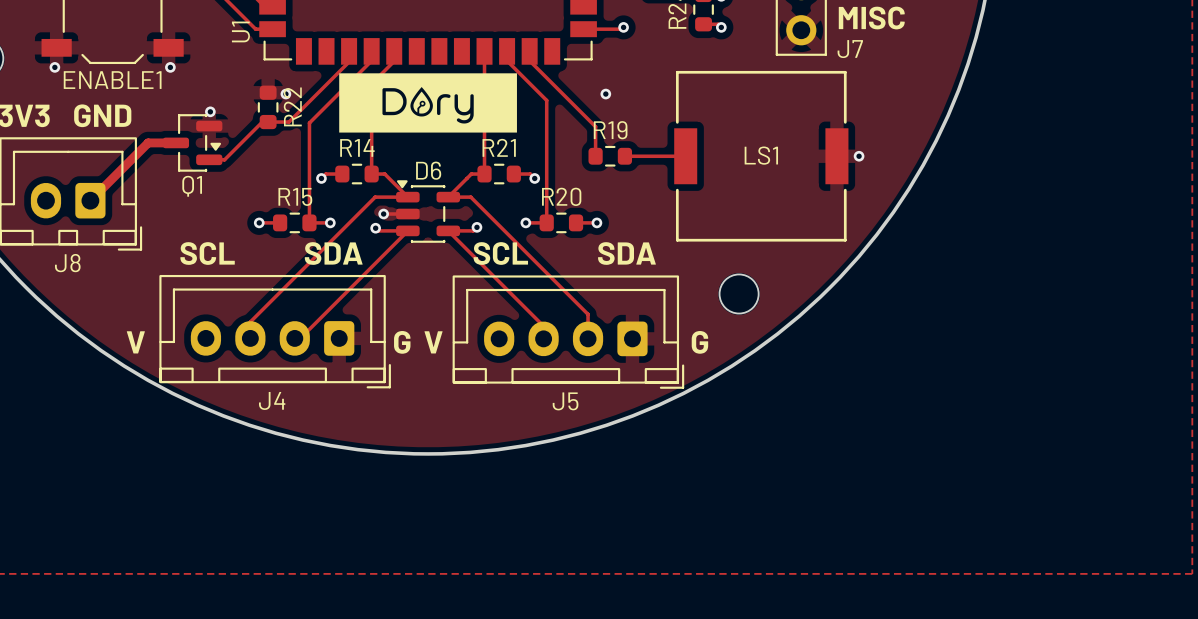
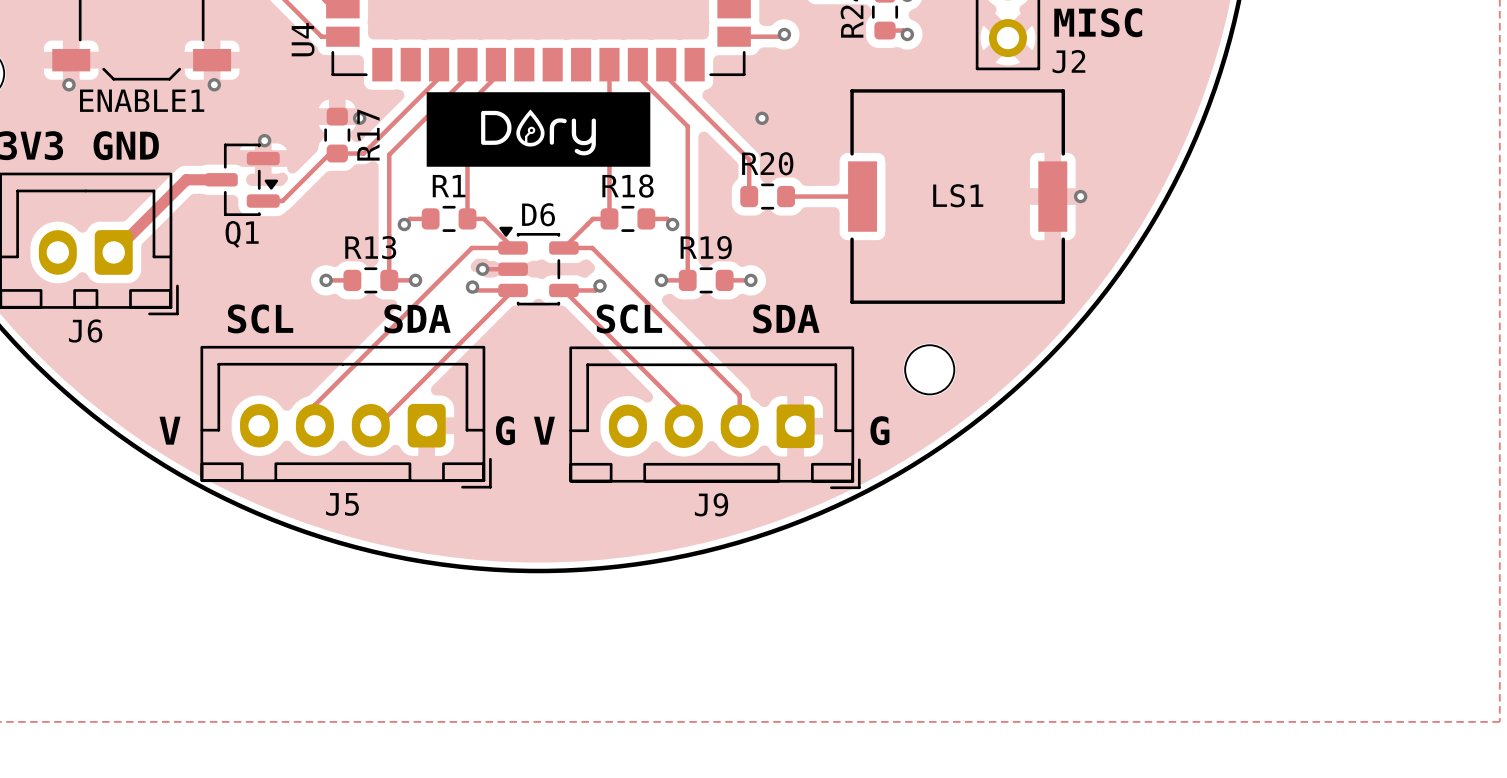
U1 name: U1 (240, 31) -> U4 (303, 39)
J7 name: J7 (850, 49) -> J2 (1068, 61)
R22 name: R22 (292, 106) -> R17 (368, 135)
R19 name: R19 (610, 130) -> R20 (767, 163)
R14 name: R14 (357, 147) -> R1 (449, 186)
R21 name: R21 (499, 147) -> R18 (628, 186)
R15 name: R15 (295, 196) -> R13 (370, 247)
R20 name: R20 (561, 196) -> R19 (706, 247)
J8 name: J8 (67, 263) -> J6 (85, 330)
J4 name: J4 (272, 400) -> J5 (342, 504)
J5 name: J5 (565, 401) -> J9 (711, 504)

